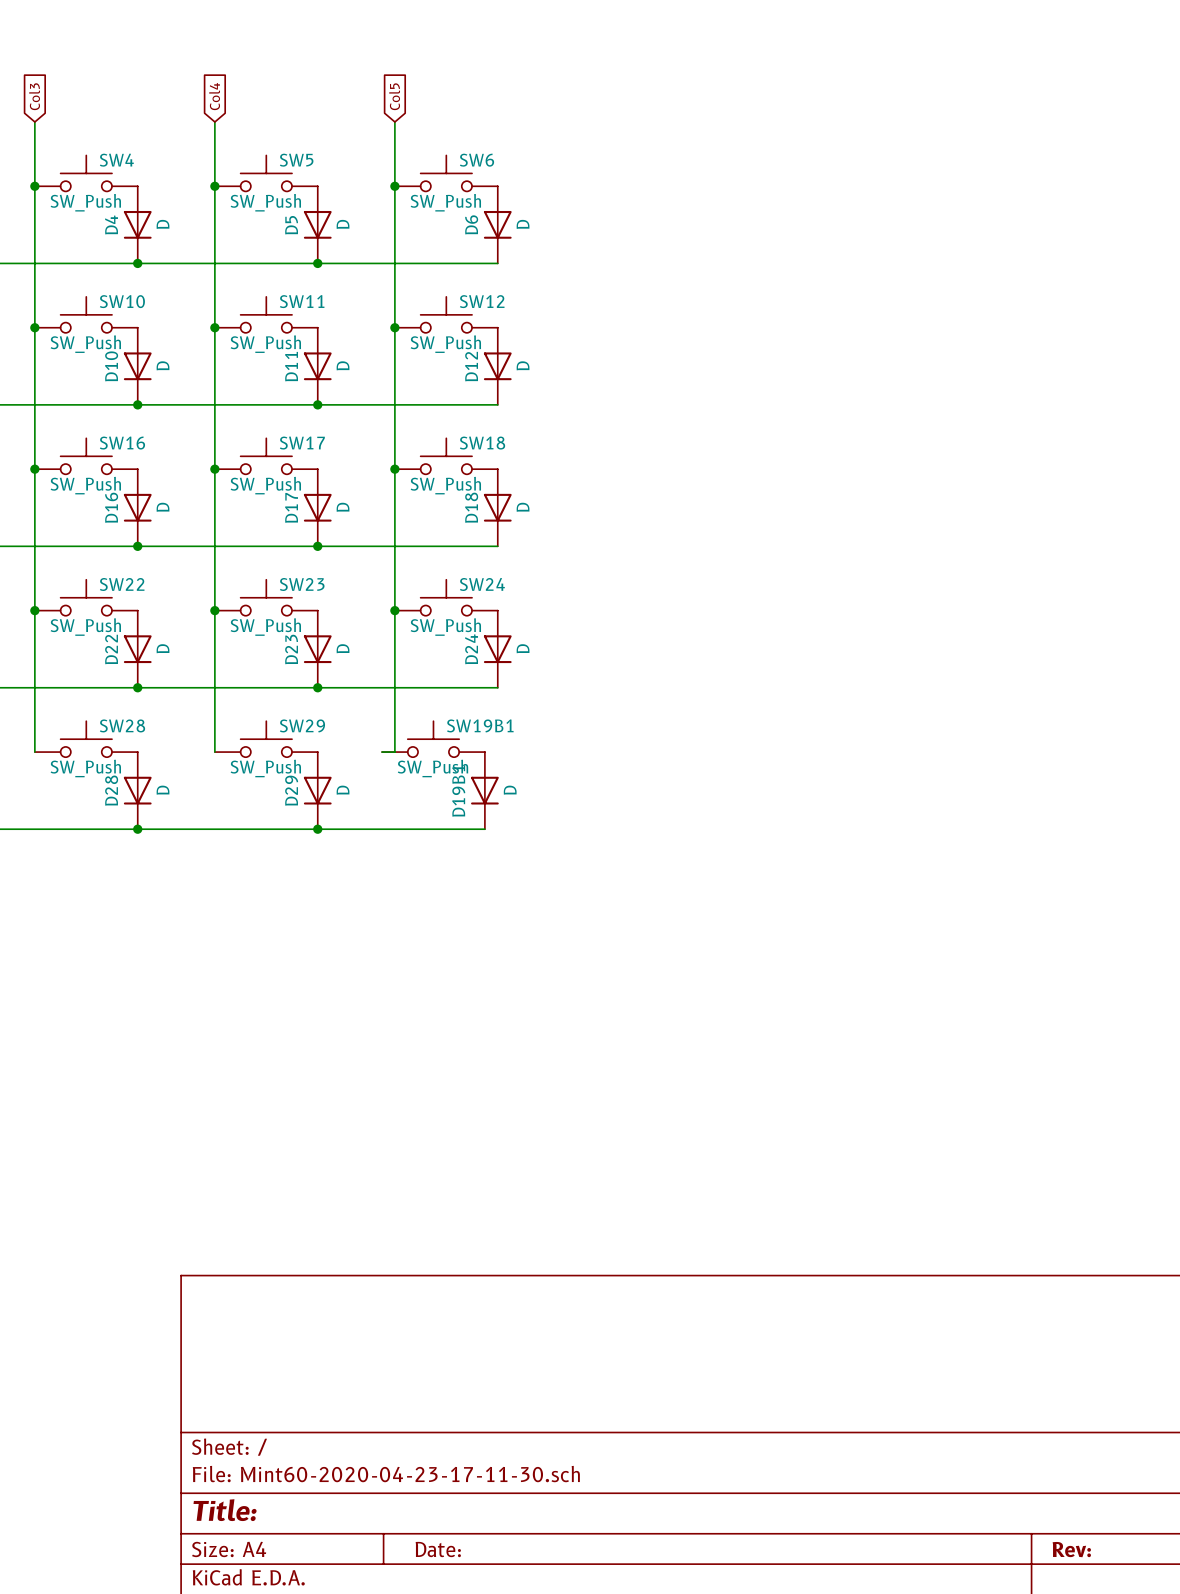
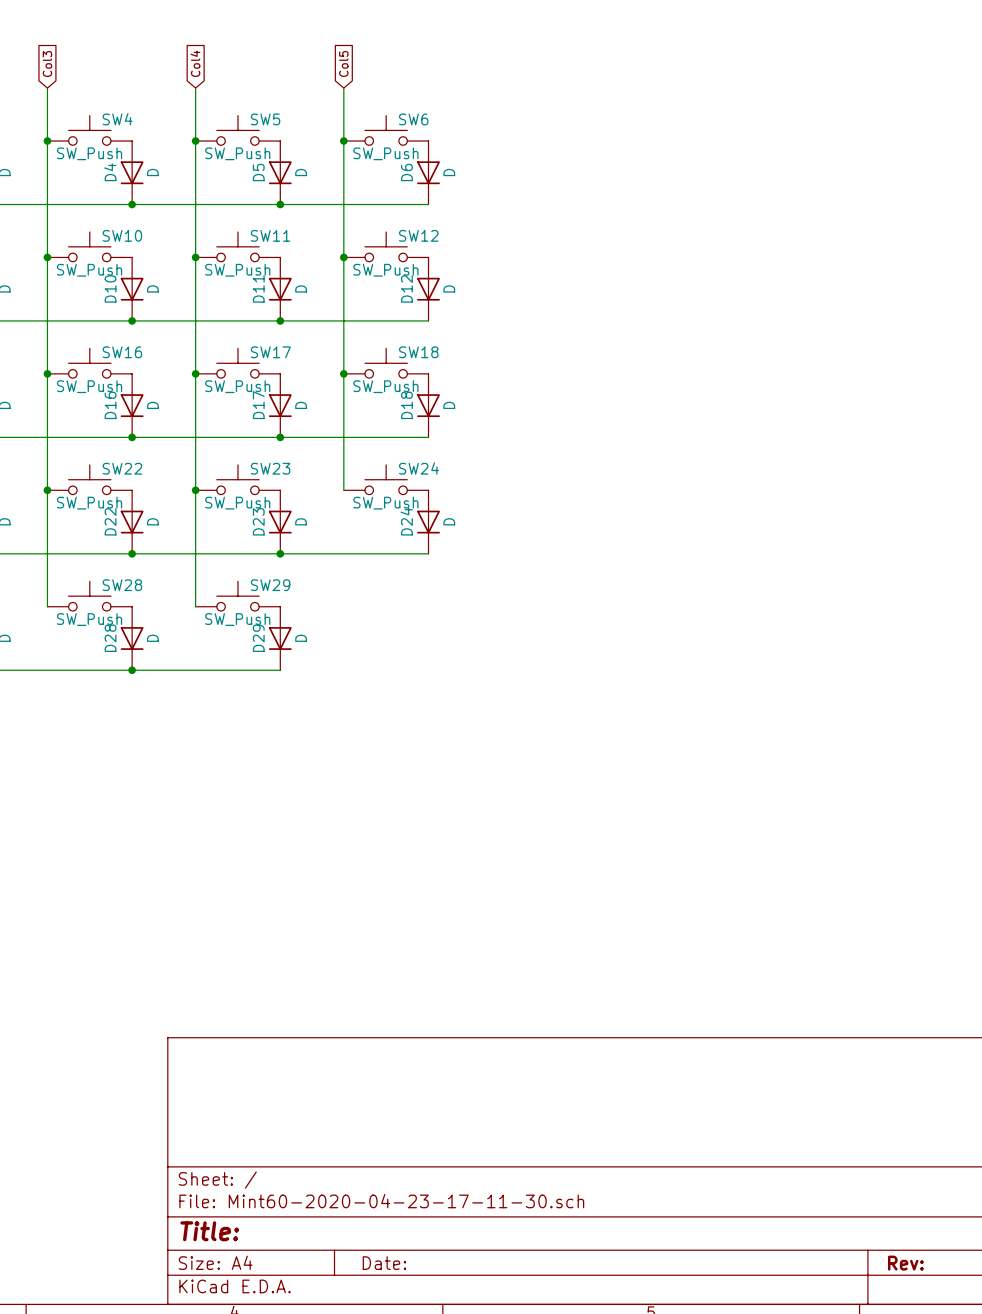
wire: (394, 610) (394, 752) (382, 752) -> none
junction: (394, 610) -> none
SW19B1: SW_Push (433, 739) -> none
D19B1: D (484, 790) -> none
wire: (317, 829) (484, 829) -> none
junction: (317, 829) -> none

